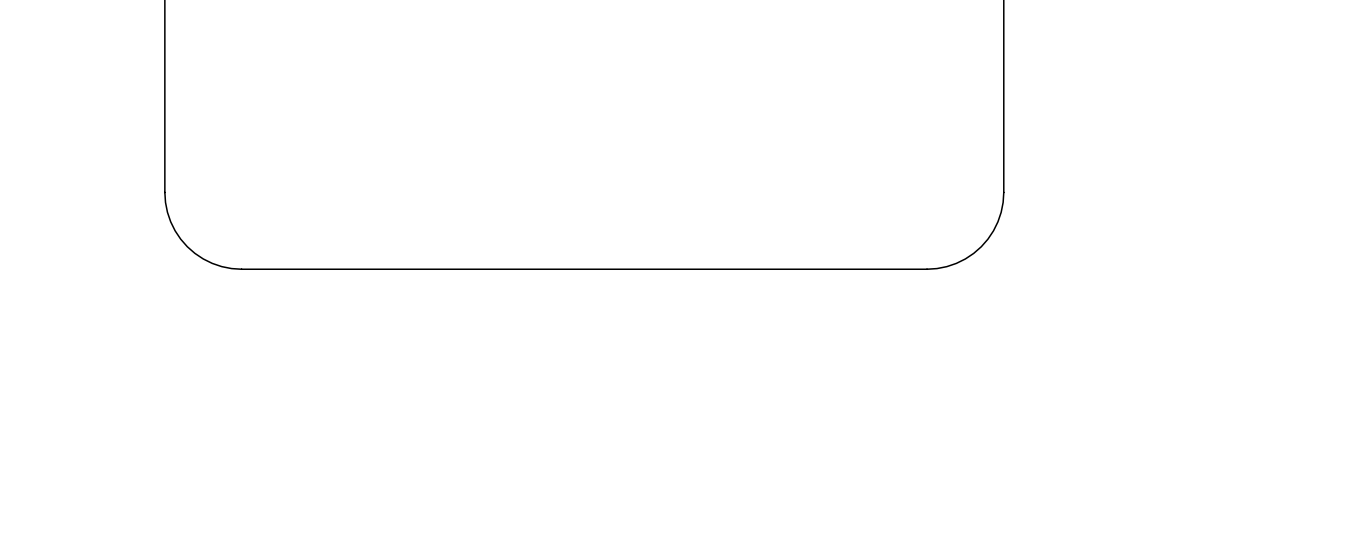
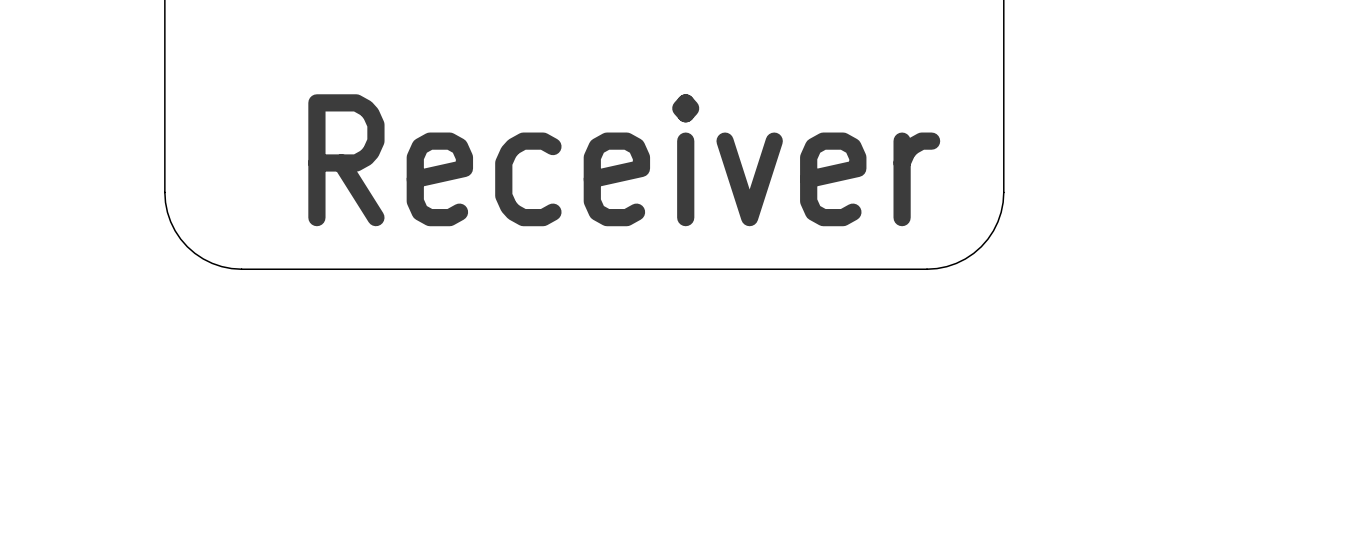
text: none -> Receiver (624, 160)

